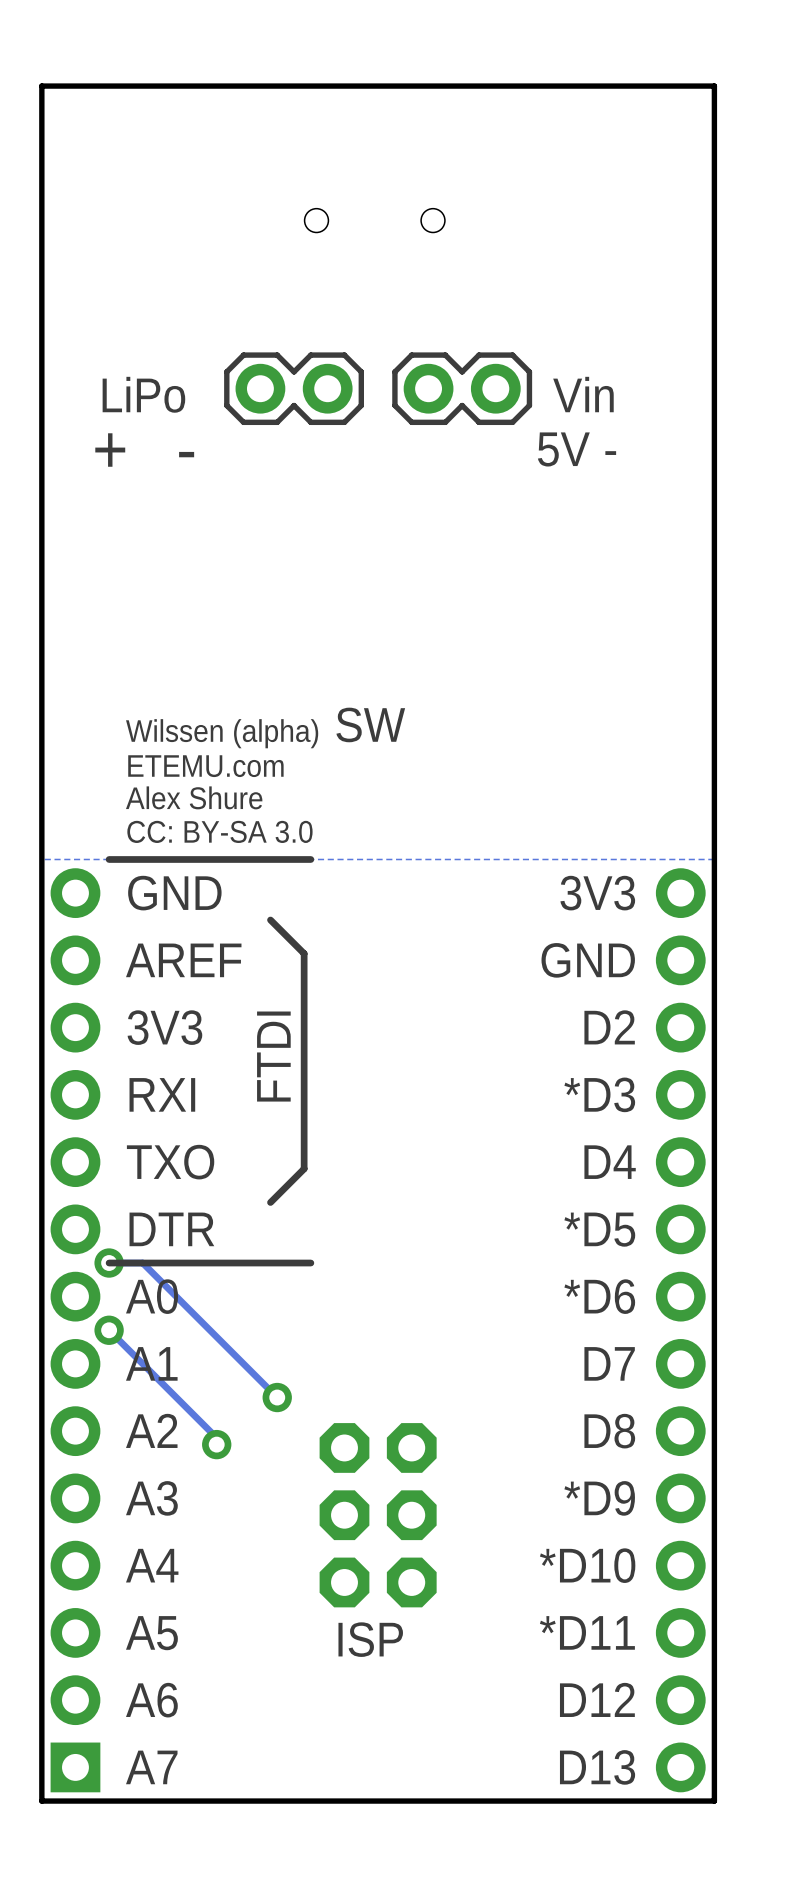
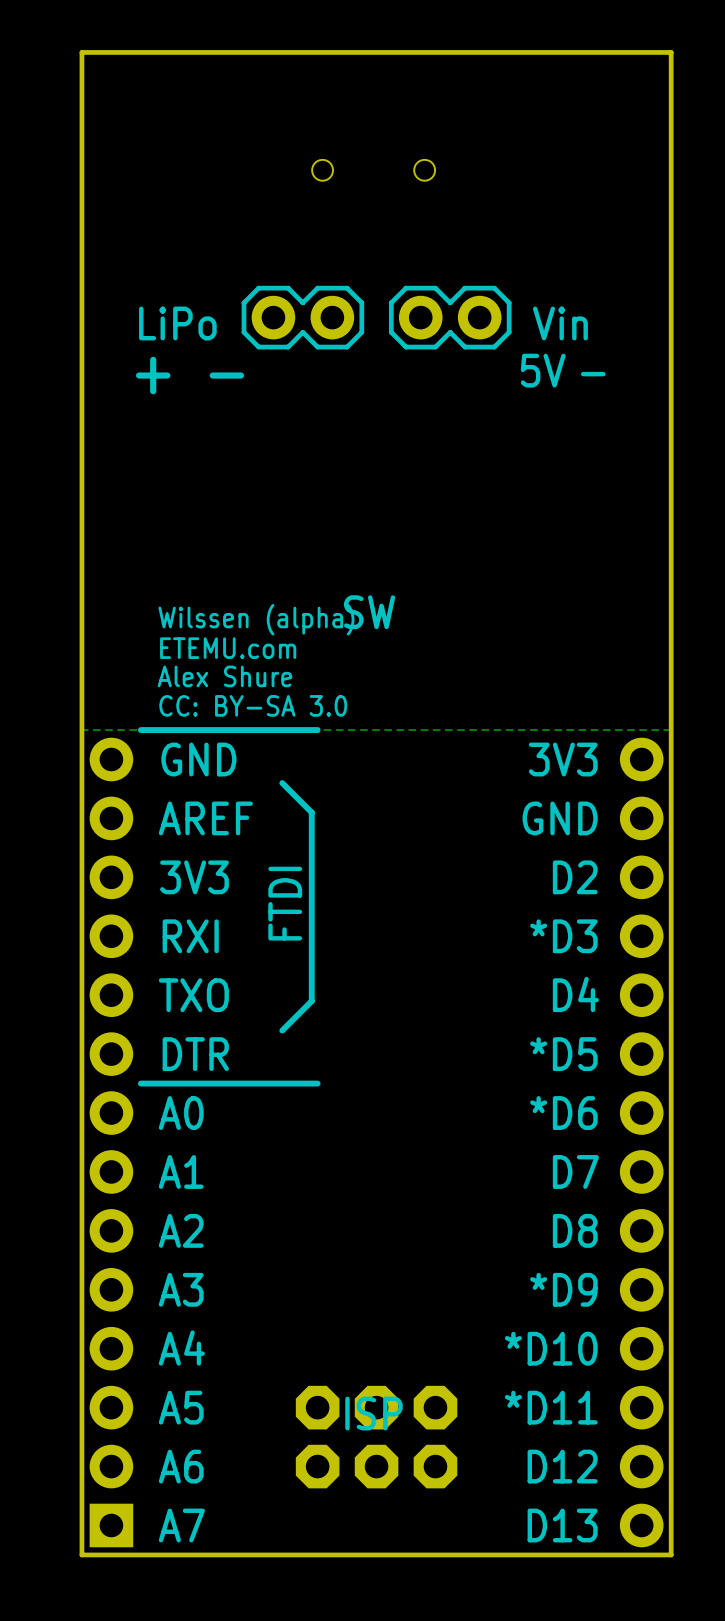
track: (109, 1263) (142, 1263) (277, 1397) -> none
via: (109, 1263) -> none
track: (109, 1330) (216, 1437) (216, 1444) -> none
via: (109, 1330) -> none
via: (277, 1397) -> none
via: (216, 1444) -> none
part rotation: 0° (378, 1515) -> 90° clockwise (376, 1437)
part position: (378, 1515) -> (376, 1437)

